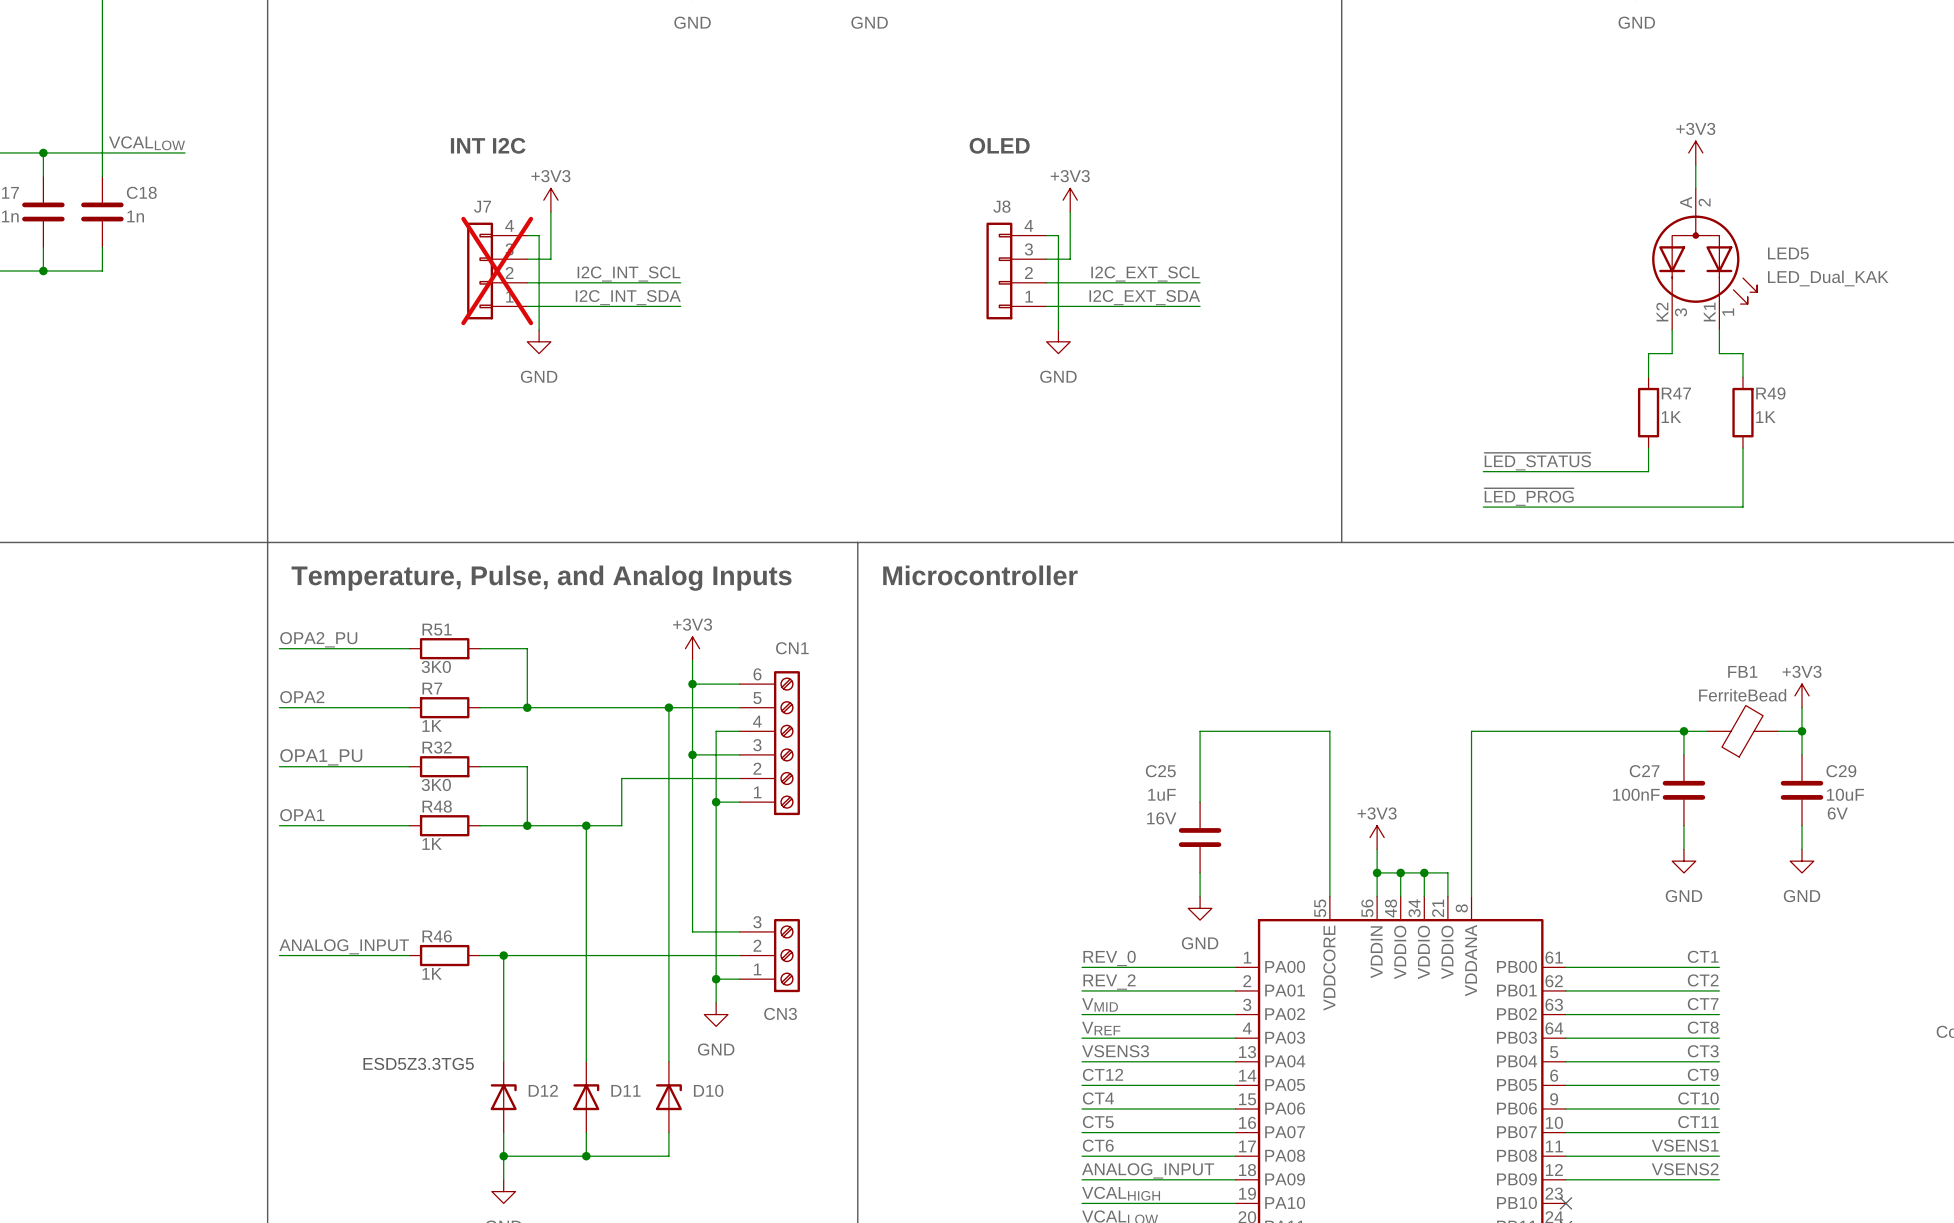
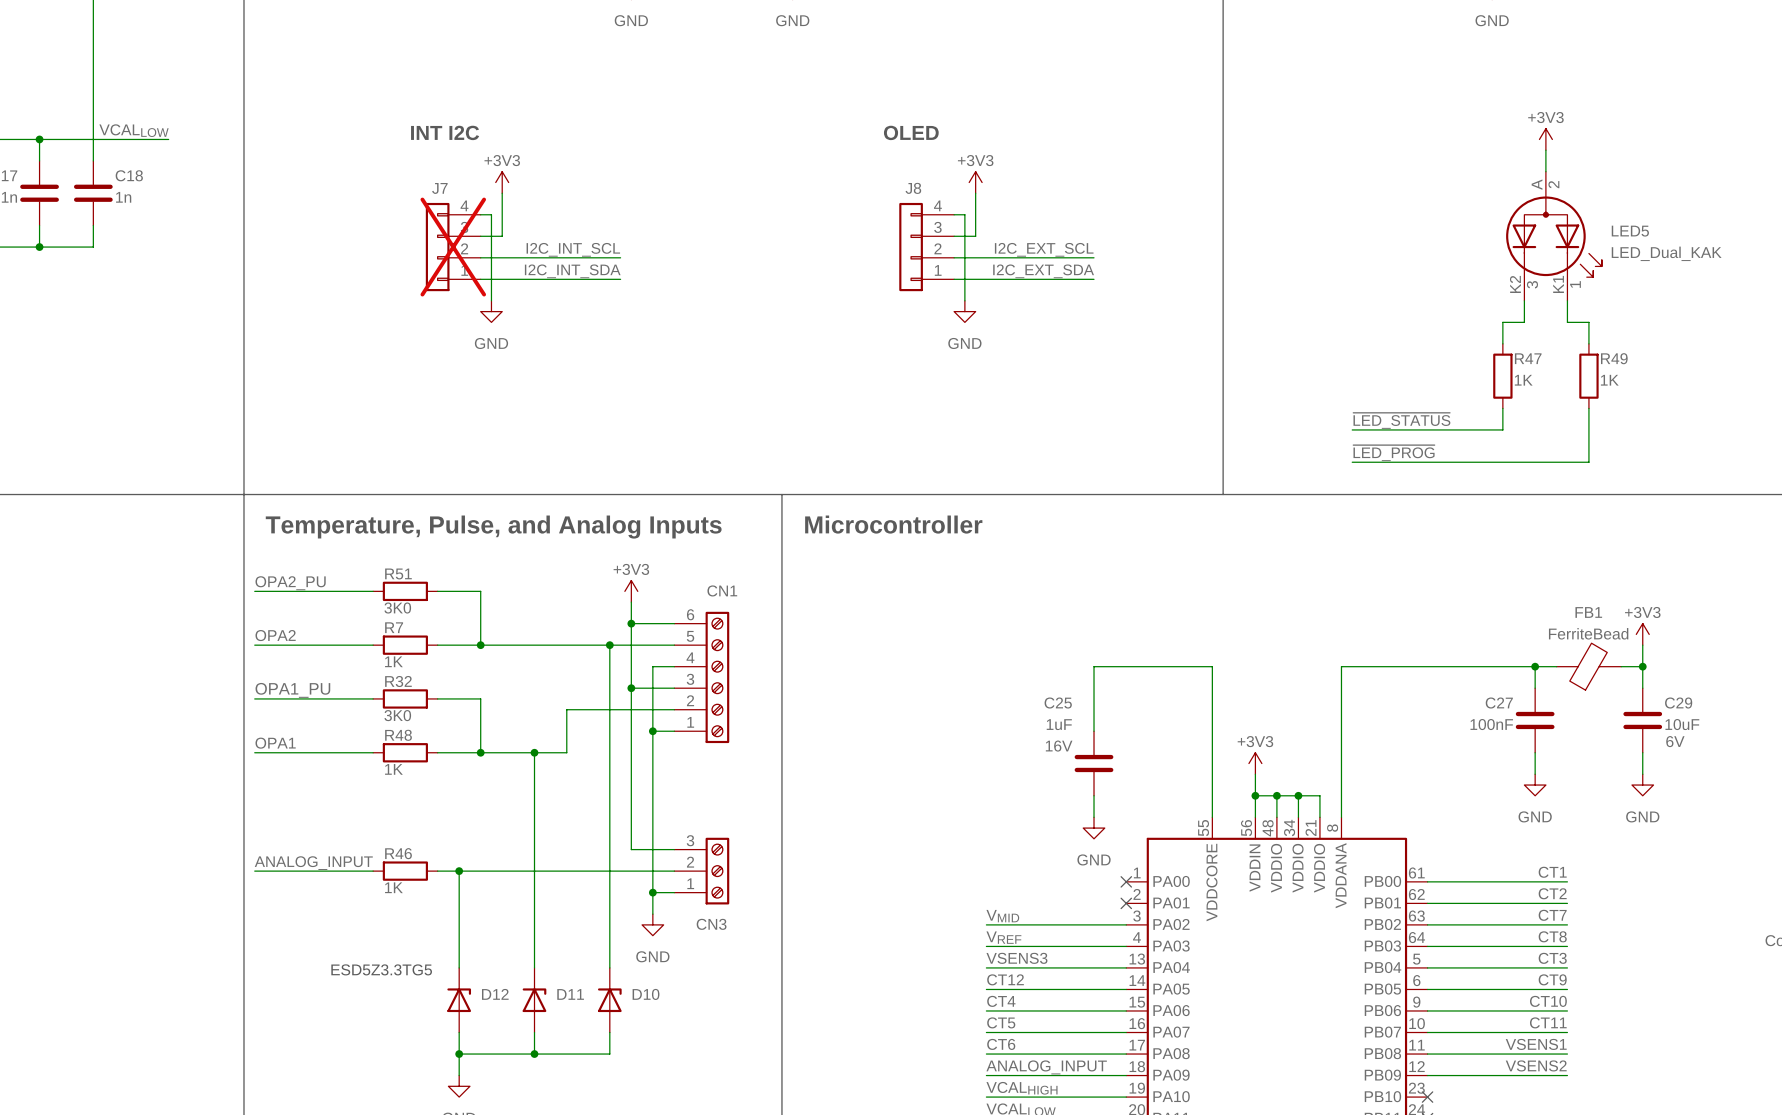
label: REV_0 (1109, 958) -> none
wire: (1082, 967) (1235, 967) -> none
no-connect mark: none -> (1126, 881)
label: REV_2 (1109, 982) -> none
wire: (1082, 990) (1235, 990) -> none
no-connect mark: none -> (1126, 903)

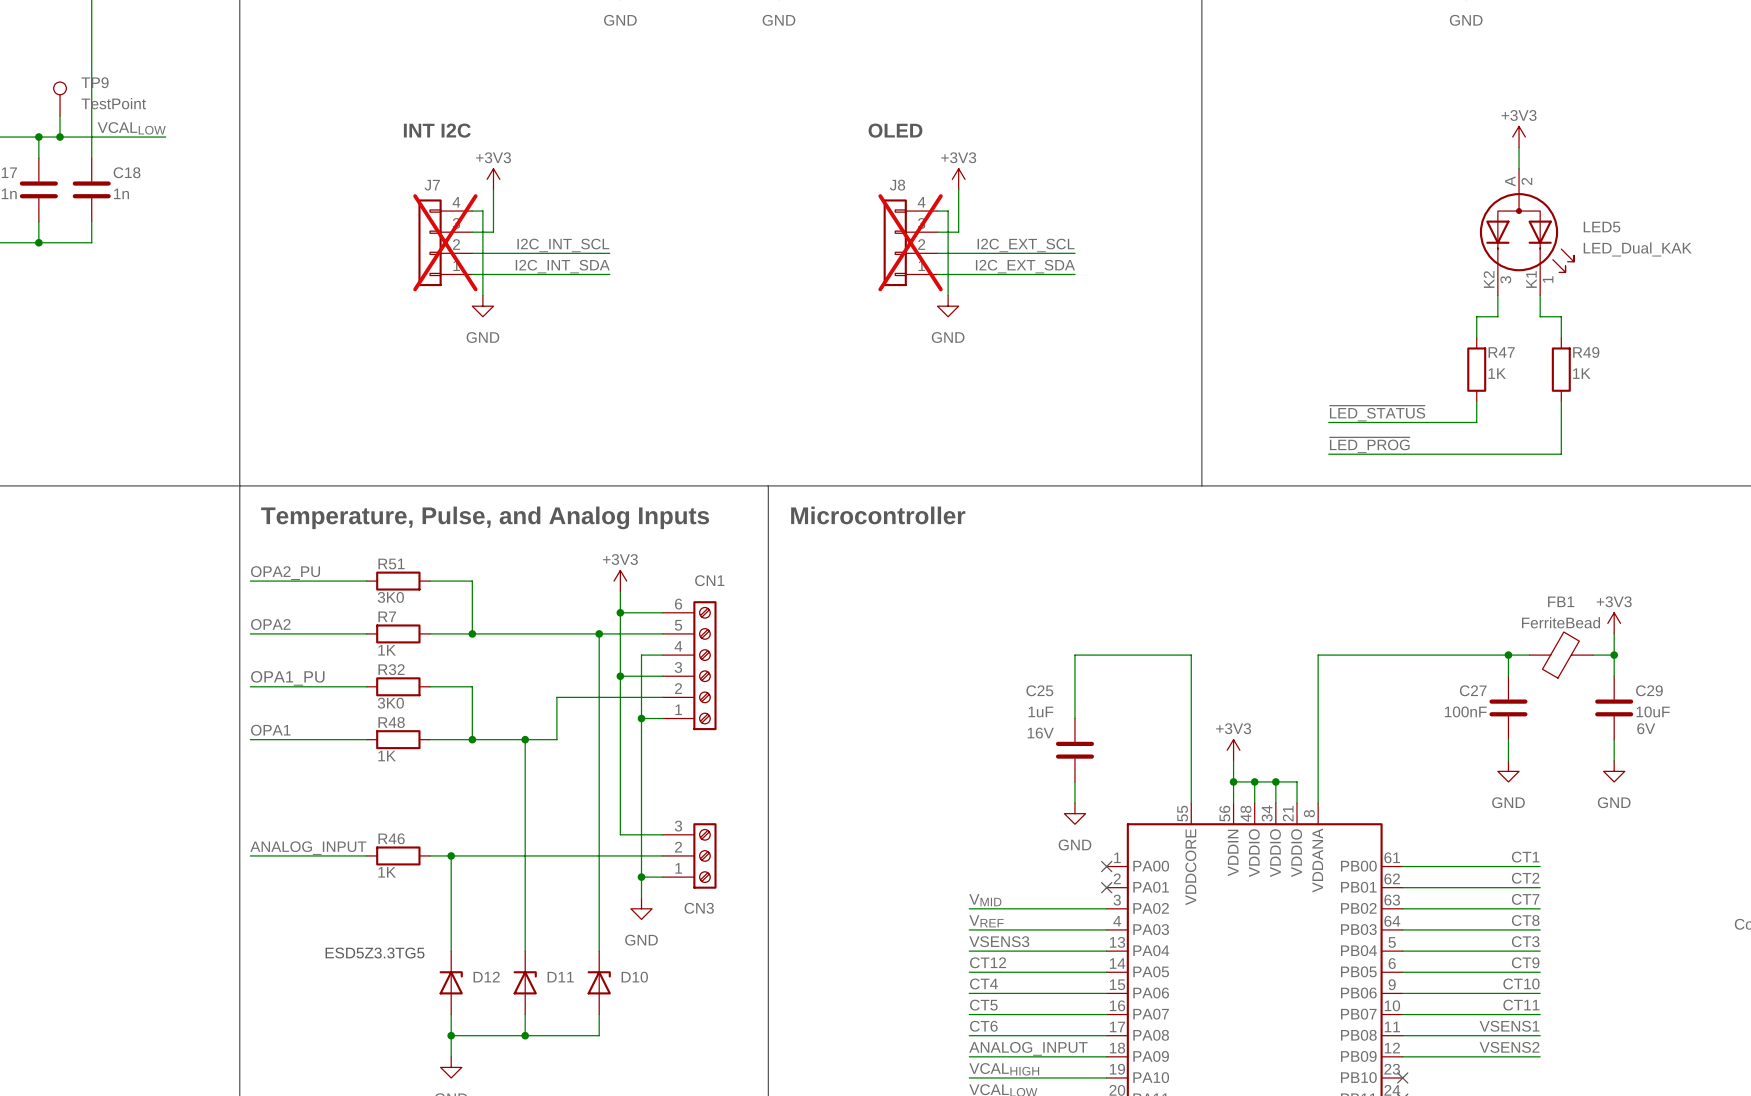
TP9: none -> TestPoint (60, 98)
wire: none -> (60, 115) (60, 137)
junction: none -> (60, 137)
J8 do-not-place cross: none -> (910, 242)

